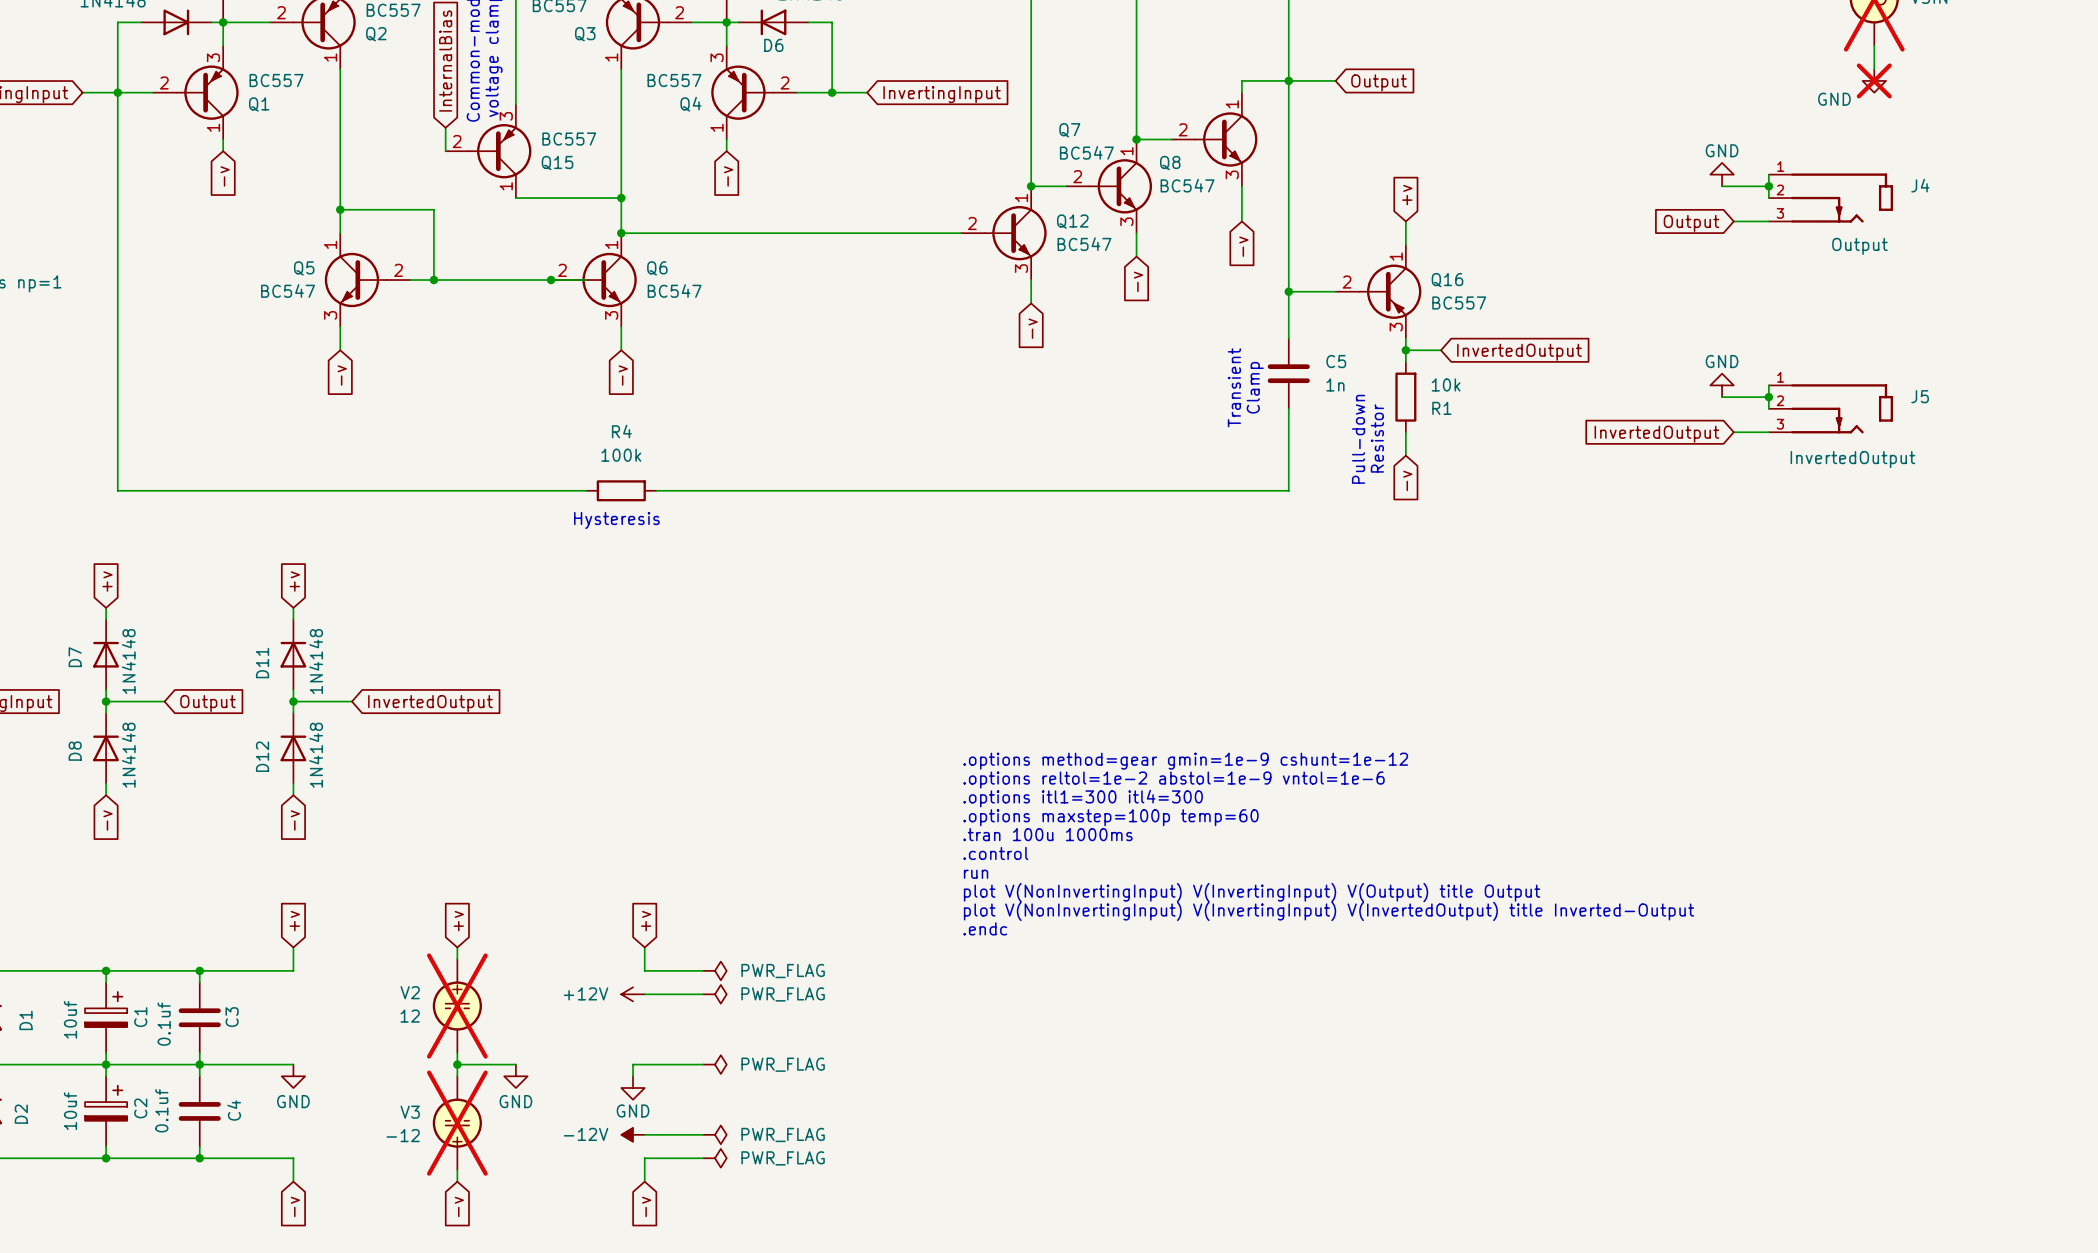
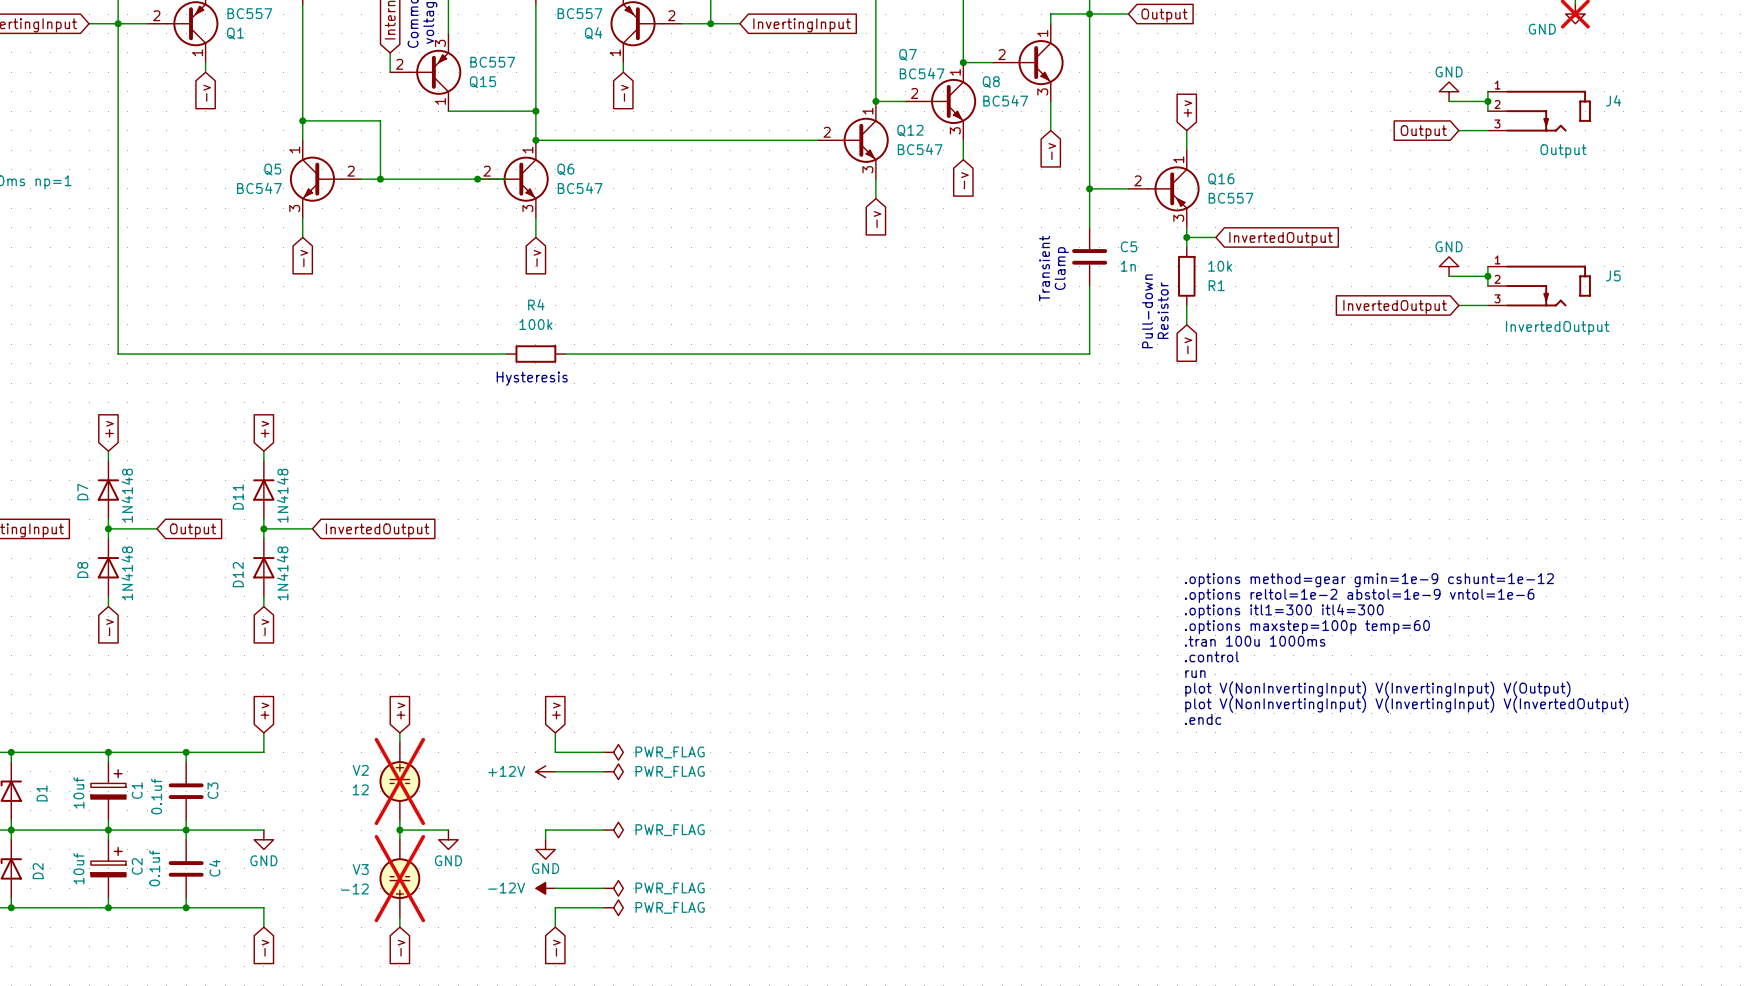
text: .options method=gear gmin=1e-9 cshunt=1e-12 (1185, 761) -> none
text: none -> .options method=gear gmin=1e-9 cshunt=1e-12 (1369, 580)
text: .options reltol=1e-2 abstol=1e-9 vntol=1e-6 (1173, 780) -> none
text: none -> .options reltol=1e-2 abstol=1e-9 vntol=1e-6 (1359, 595)
text: .options itl1=300 itl4=300 (1083, 798) -> none
text: none -> .options itl1=300 itl4=300 (1284, 611)
text: .options maxstep=100p temp=60 (1110, 817) -> none
text: none -> .options maxstep=100p temp=60 (1307, 627)
text: .tran 100u 1000ms (1047, 834) -> none
text: none -> .tran 100u 1000ms (1255, 641)
text: .control (995, 853) -> none
text: none -> .control (1211, 656)
text: run (976, 874) -> none
text: none -> run (1195, 674)
text: plot V(NonInvertingInput) V(InvertingInput) V(Output) title Output (1252, 892) -> none
text: none -> plot V(NonInvertingInput) V(InvertingInput) V(Output) (1377, 689)
text: plot V(NonInvertingInput) V(InvertingInput) V(InvertedOutput) title Inverted-Output (1329, 911) -> none
text: none -> plot V(NonInvertingInput) V(InvertingInput) V(InvertedOutput) (1406, 704)
text: .endc (985, 928) -> none
text: none -> .endc (1203, 719)

